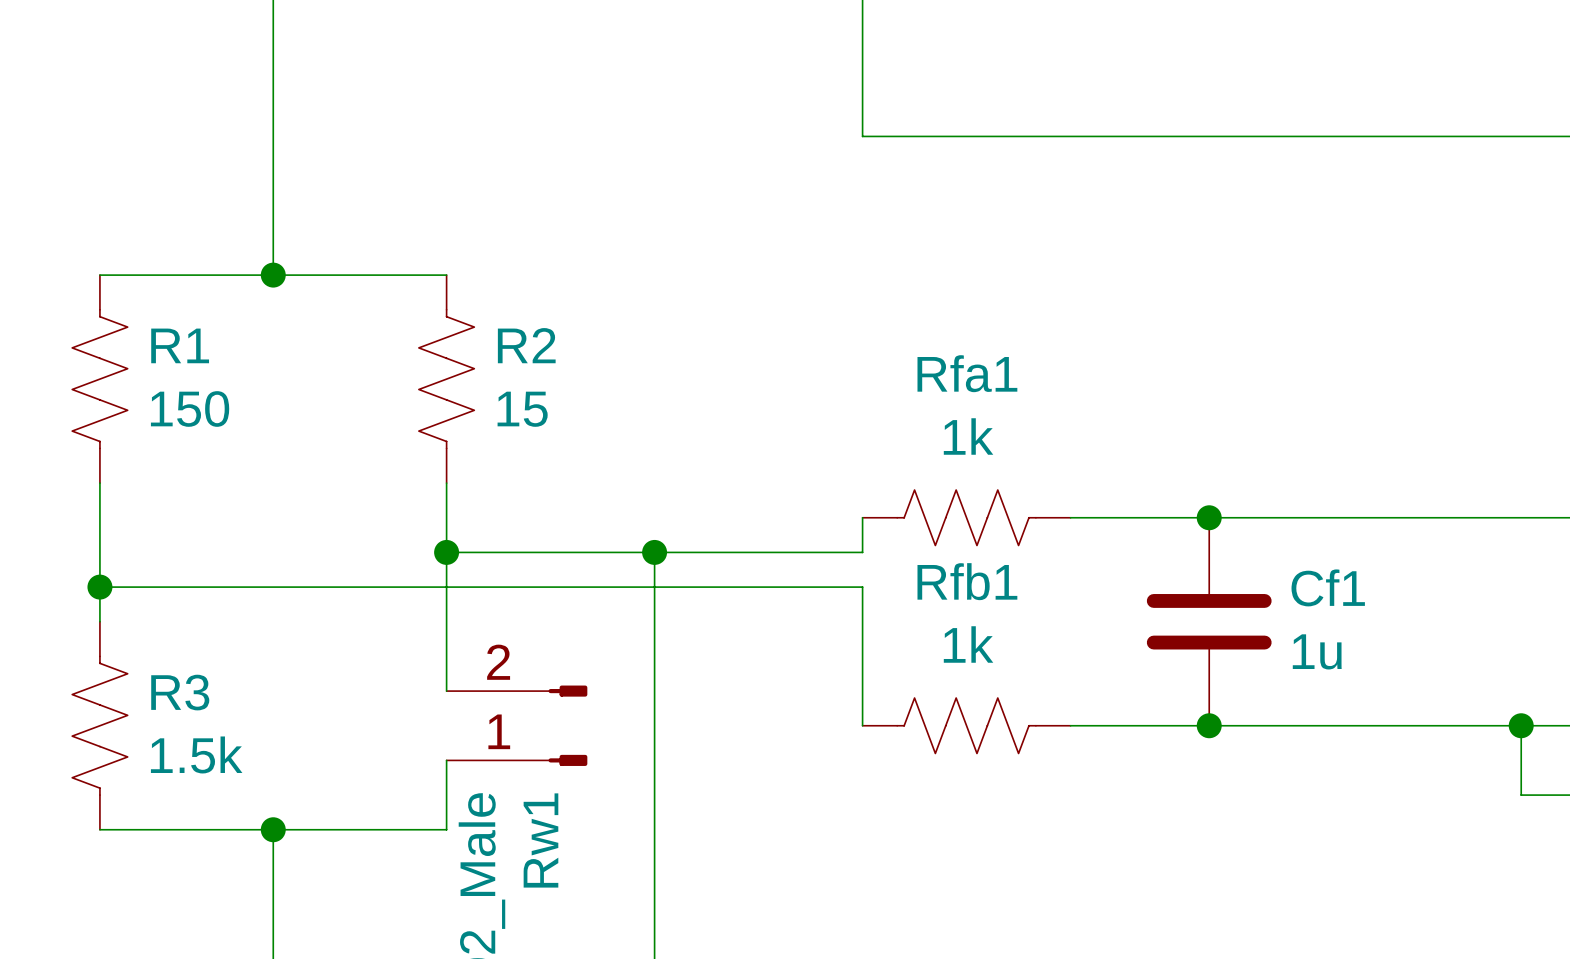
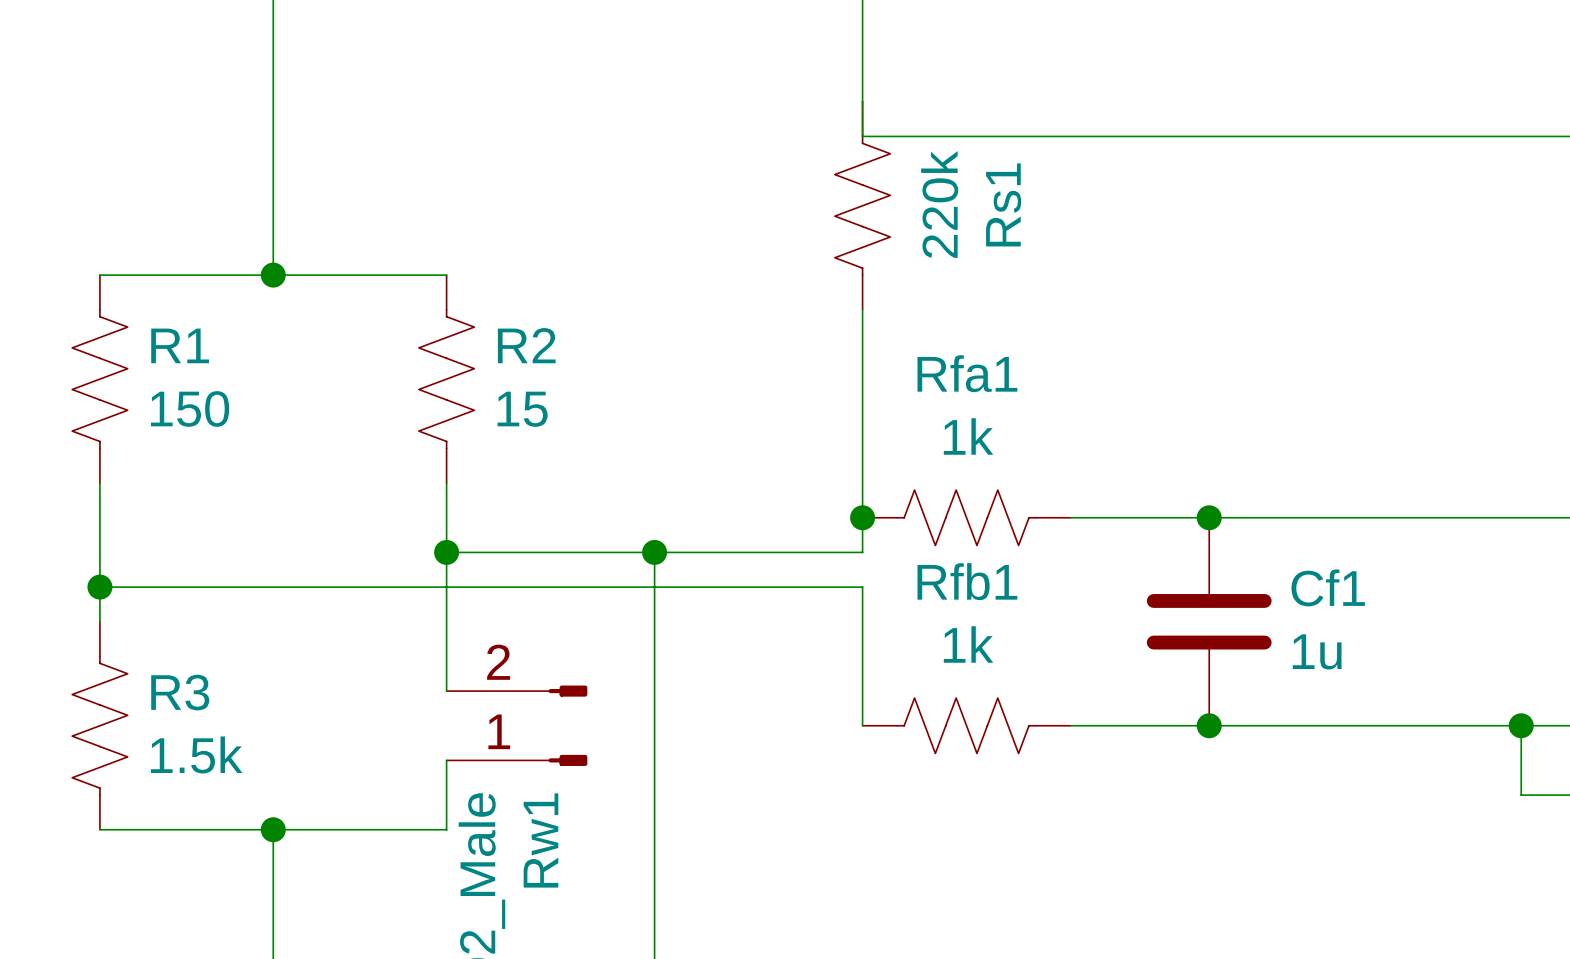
Rs1: none -> 220k (862, 205)
wire: none -> (862, 309) (862, 517)
junction: none -> (862, 517)

